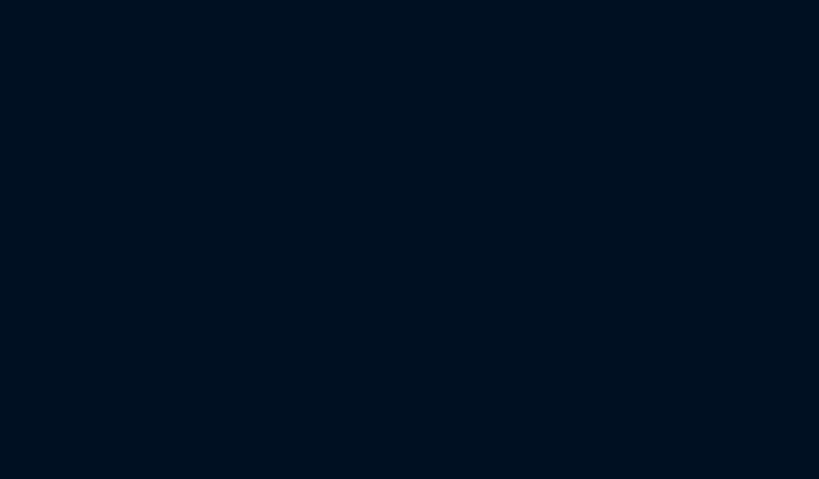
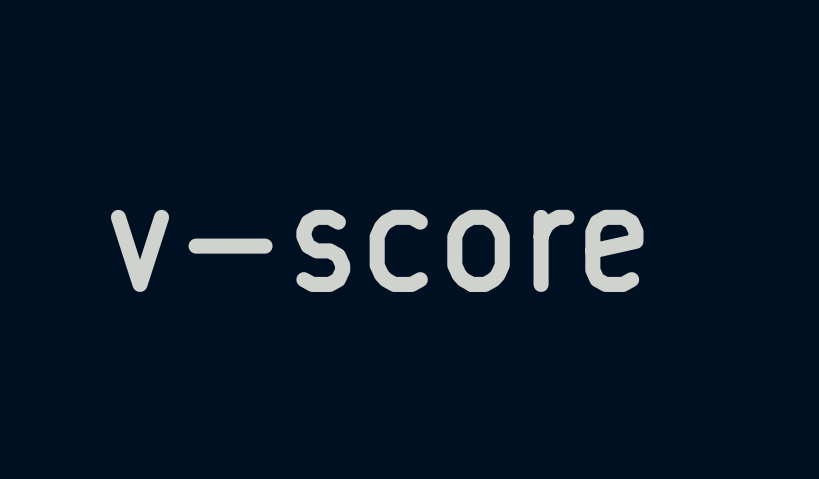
text: none -> v-score (377, 250)

